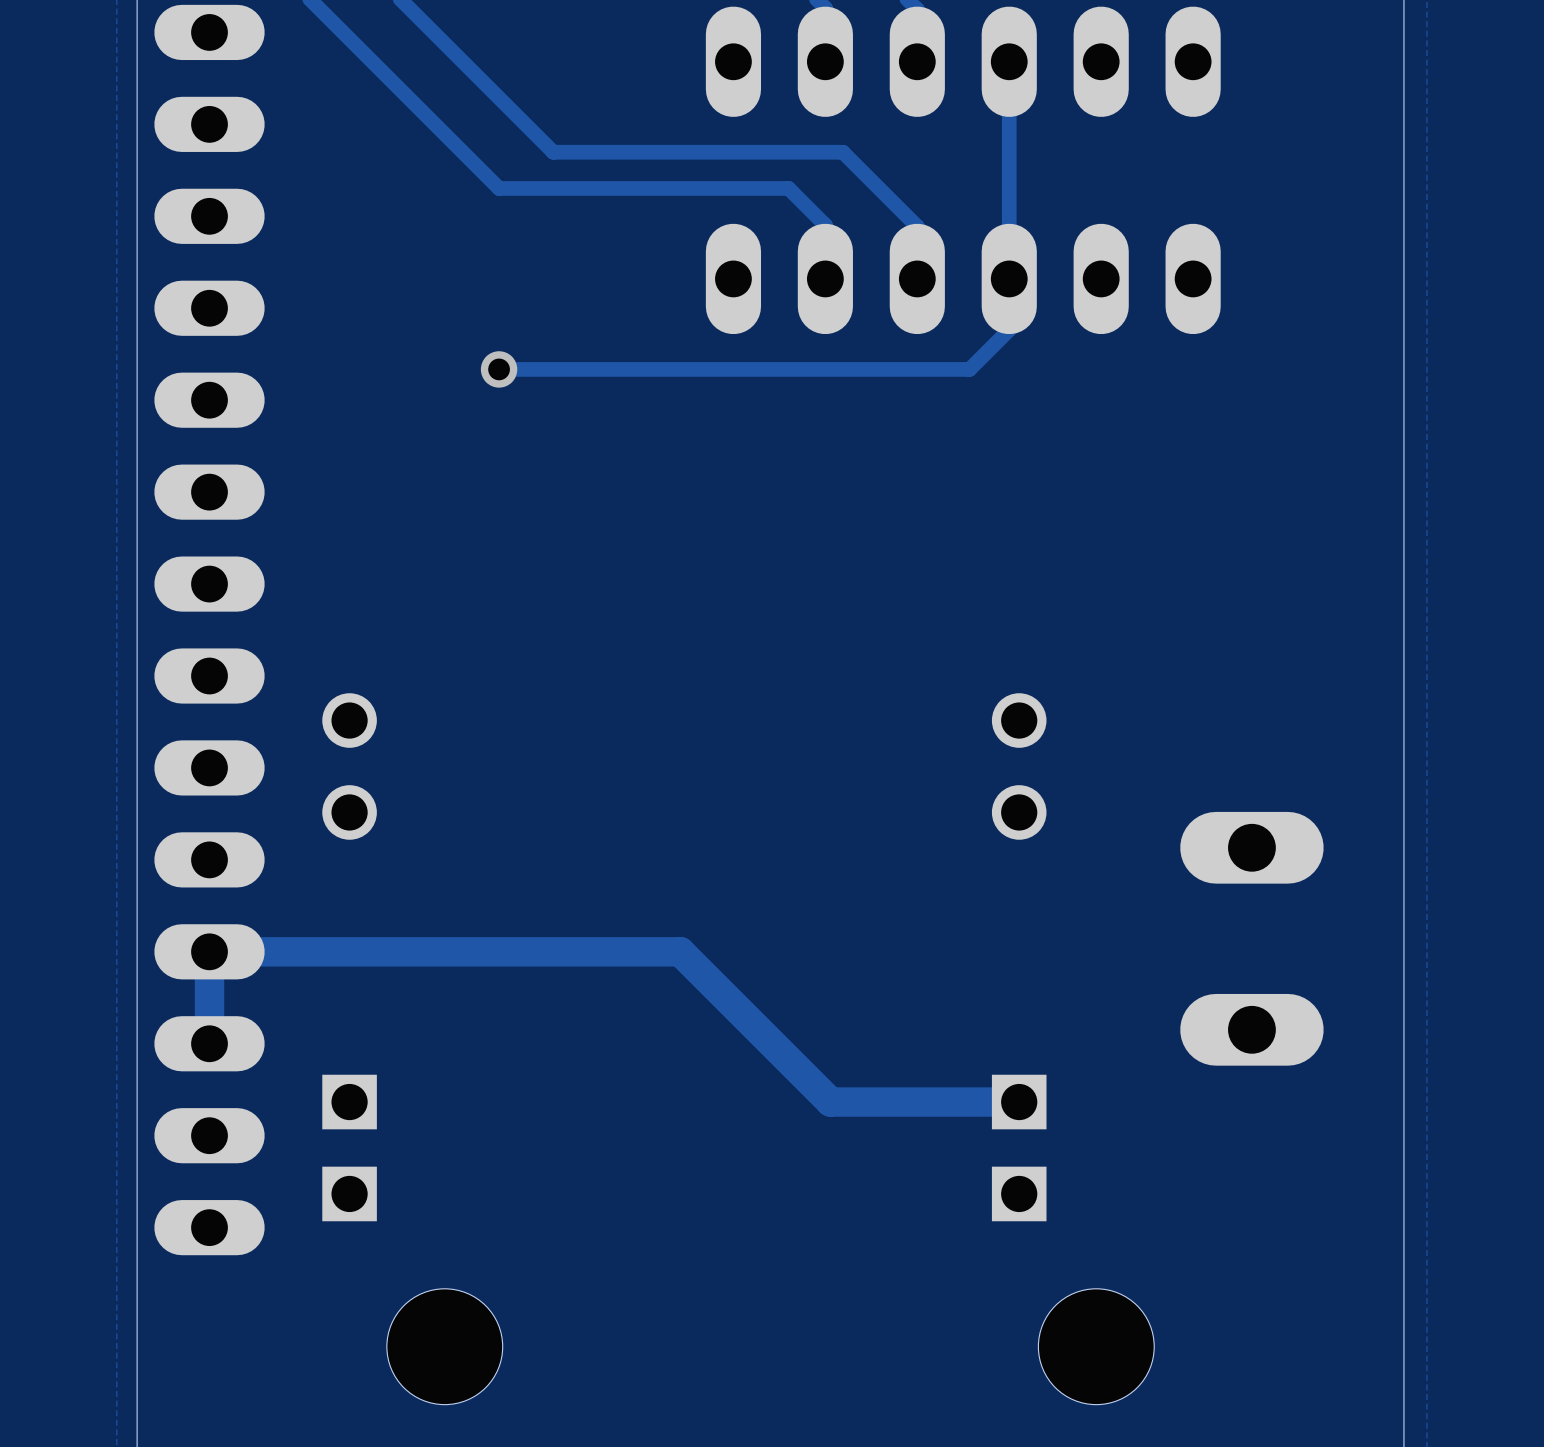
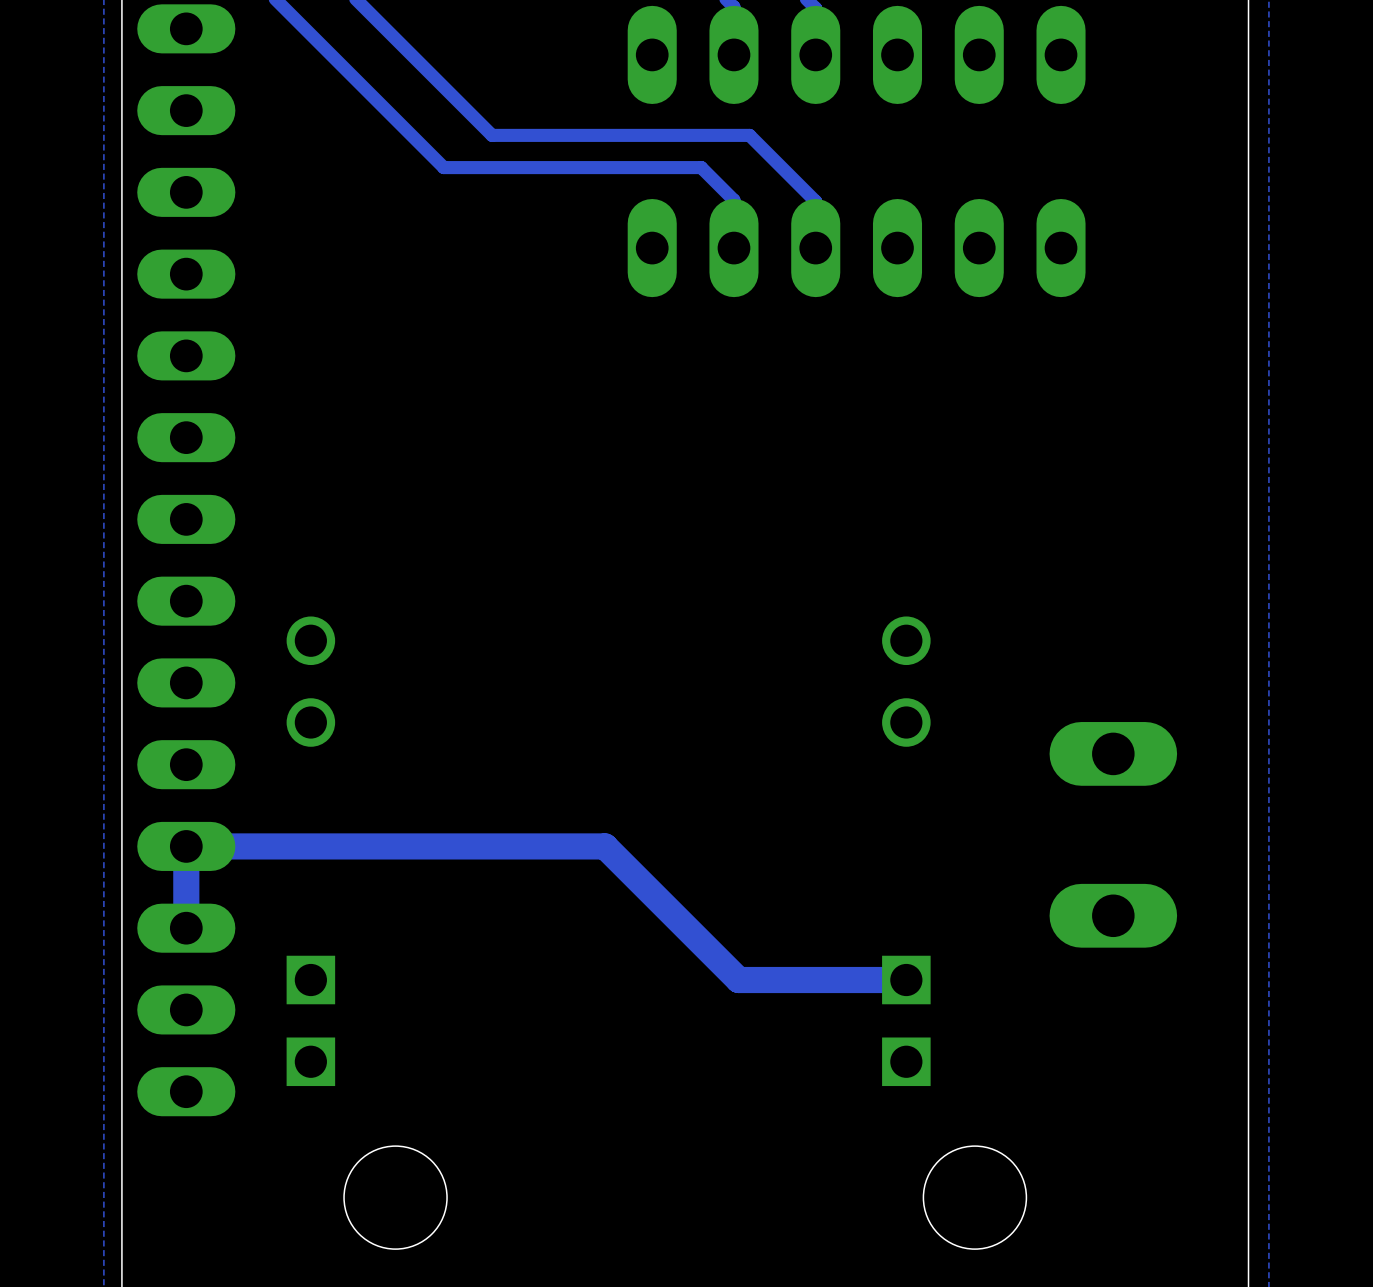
track: (1009, 61) (1009, 329) (969, 369) (499, 369) -> none
via: (499, 369) -> none

